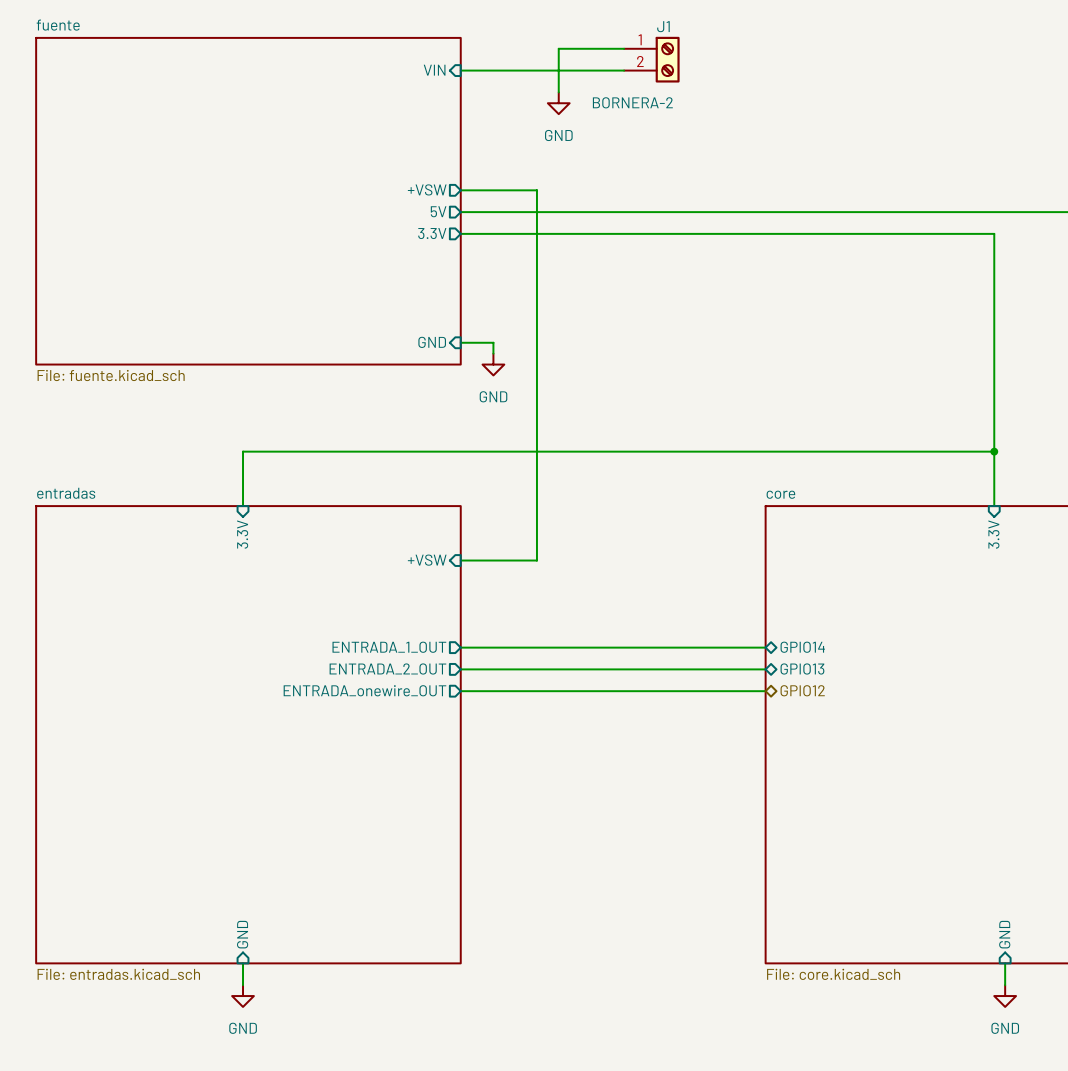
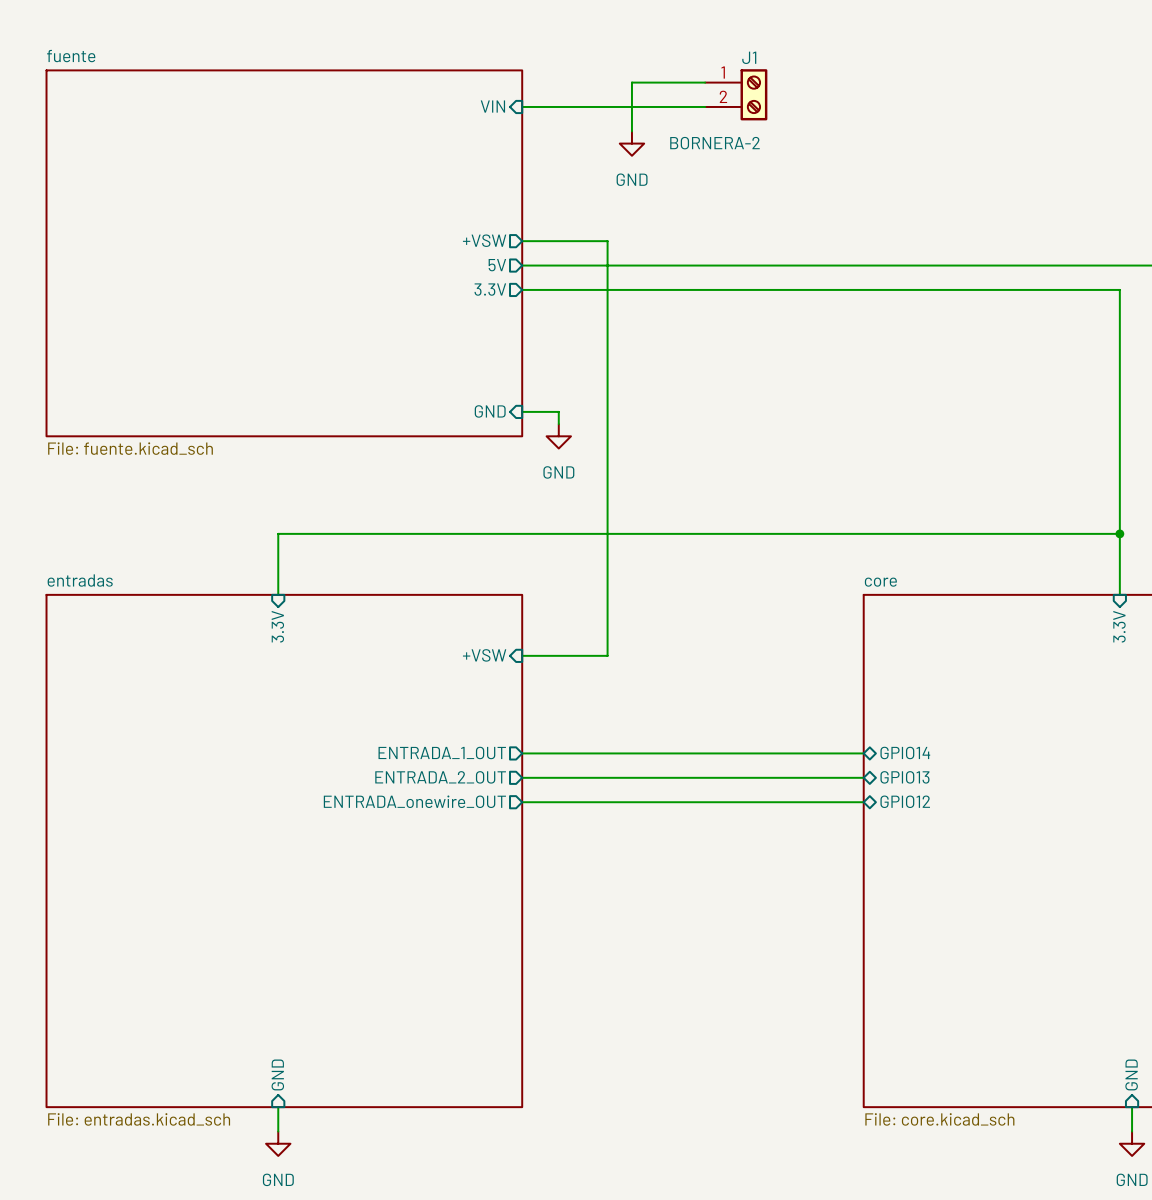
hierarchical label: GPIO12 (802, 690) -> none
sheet pin: none -> GPIO12 (905, 801)

